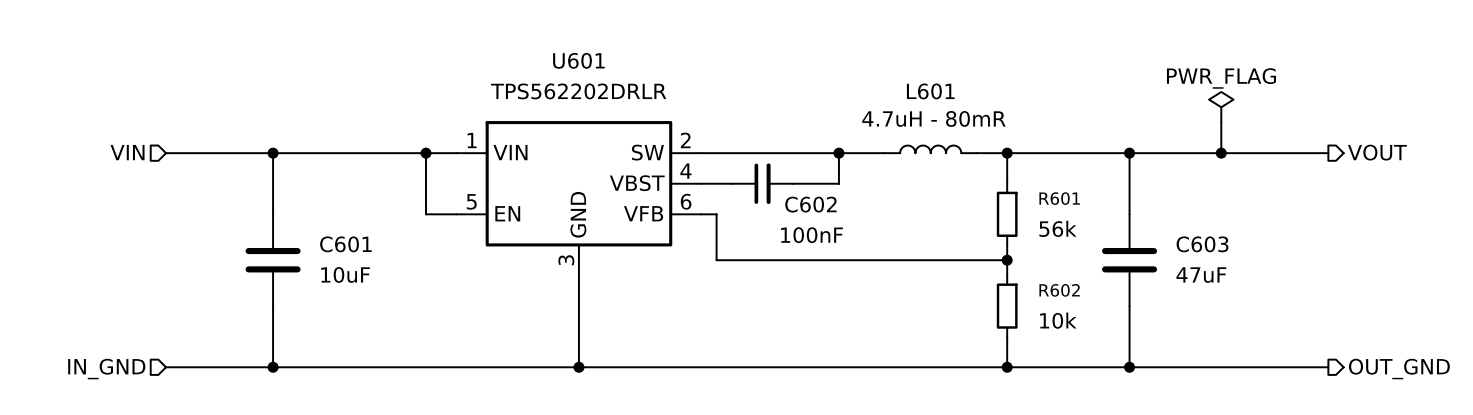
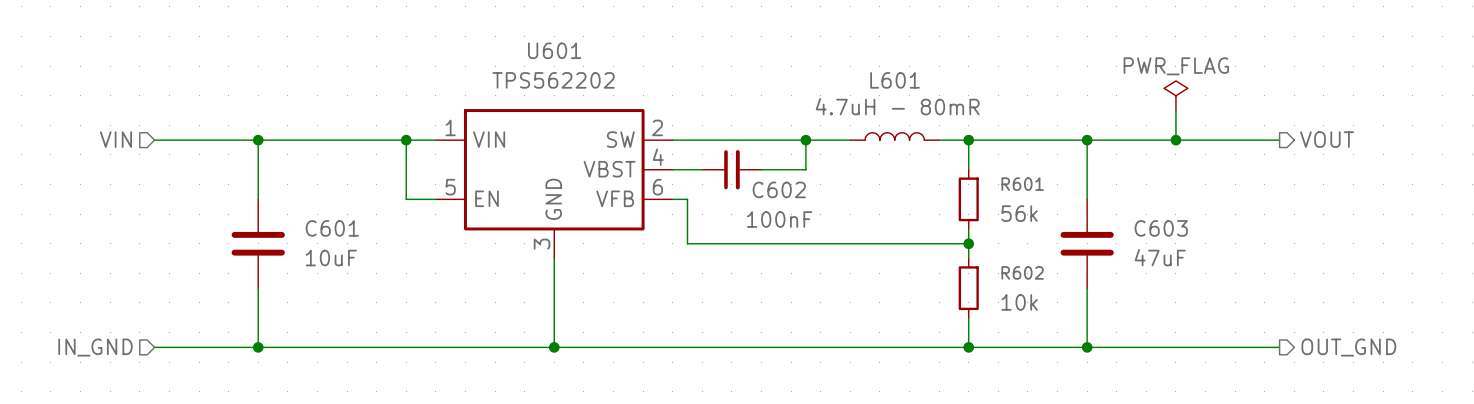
U601 value: TPS562202DRLR (578, 91) -> TPS562202 (553, 80)

